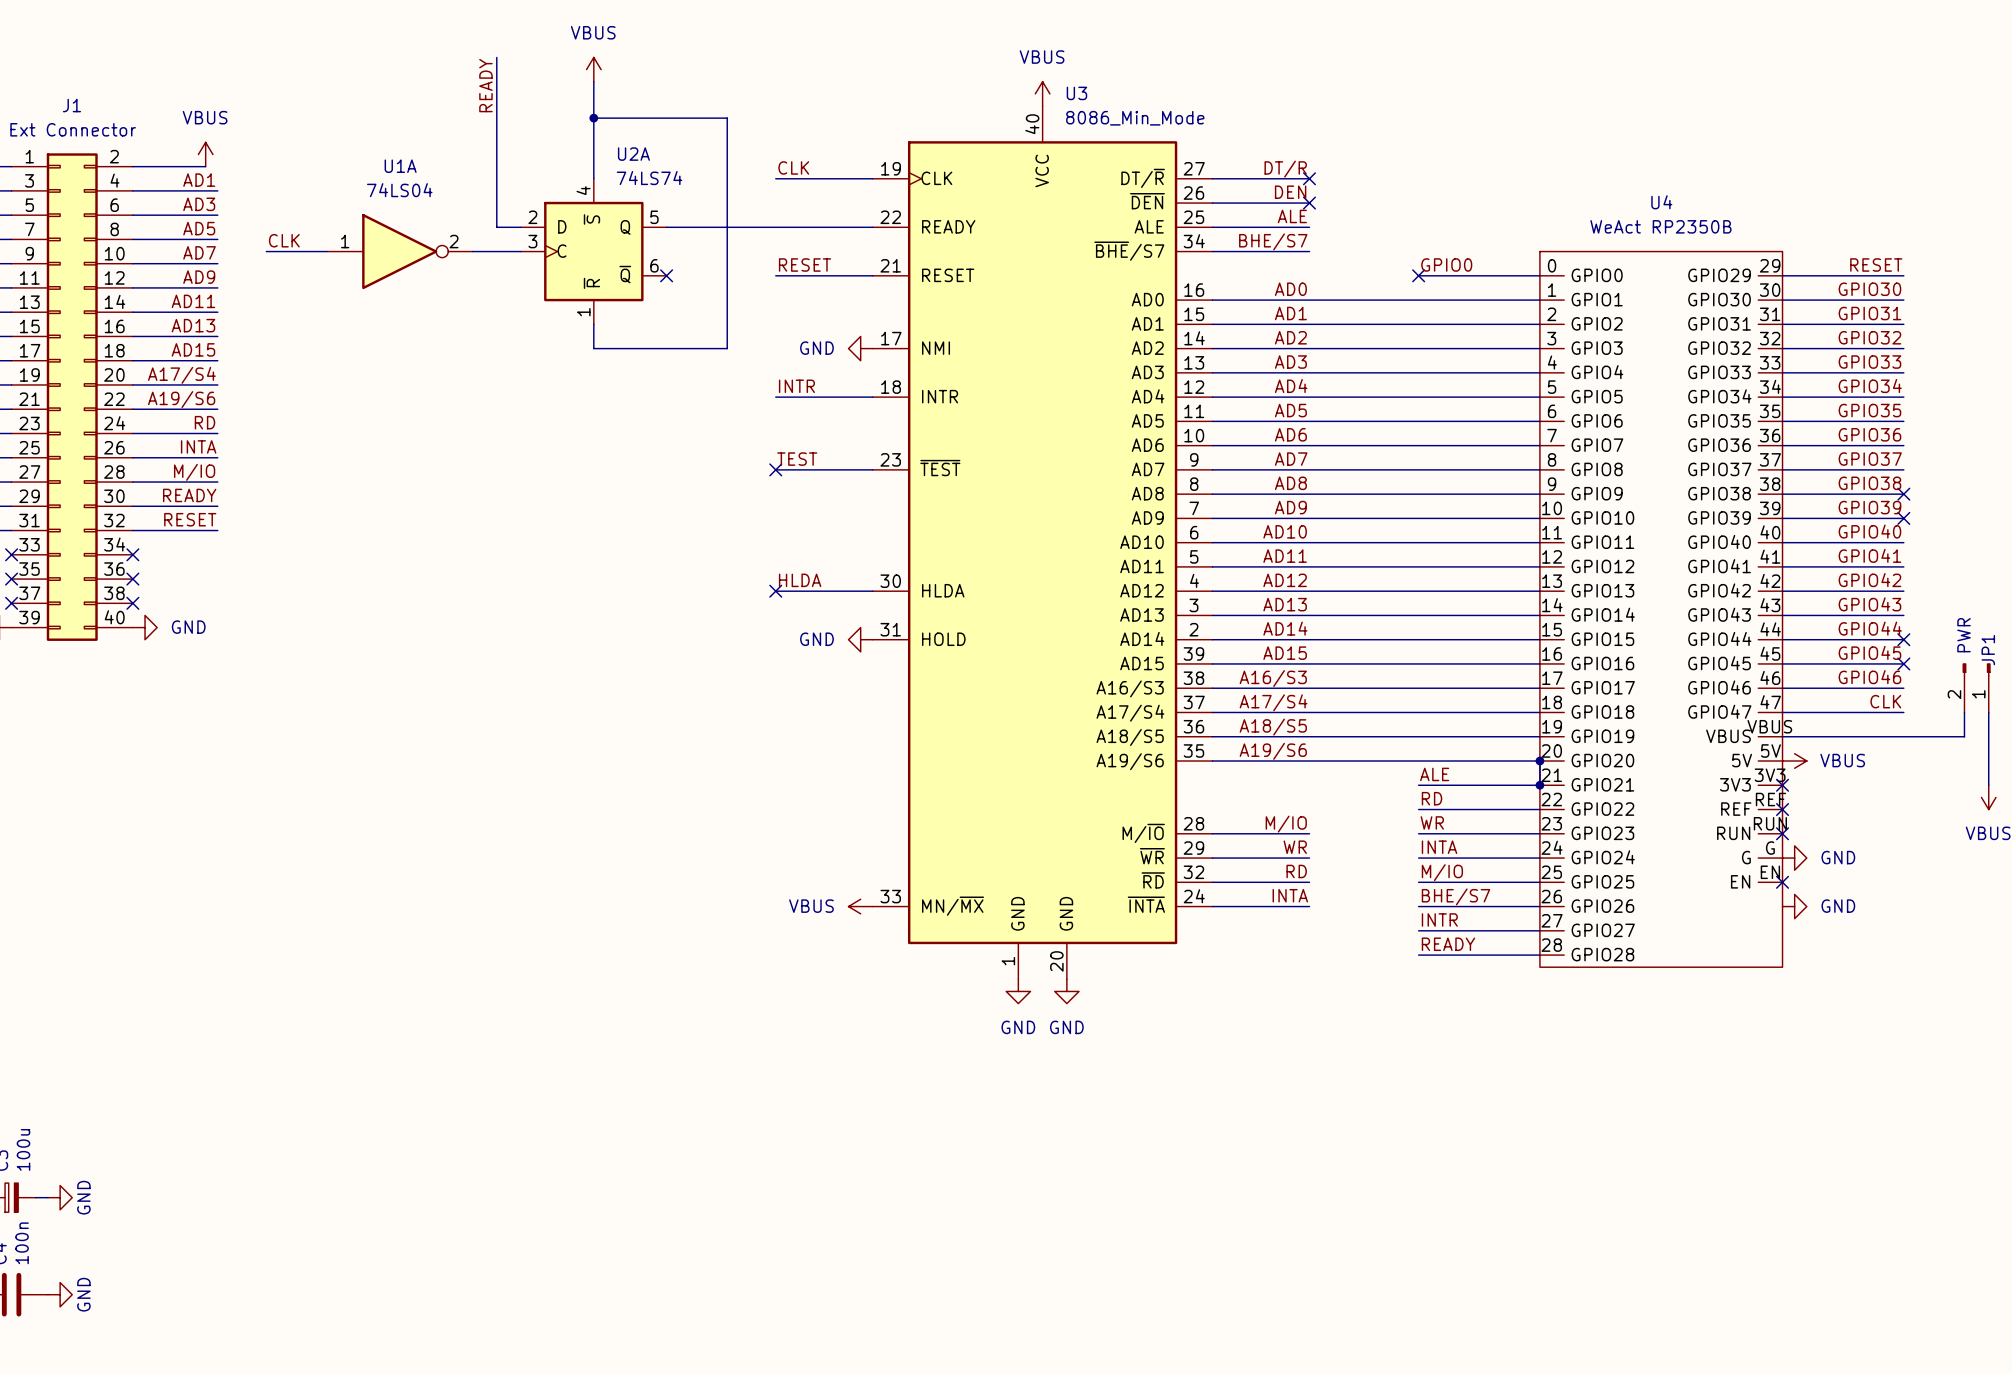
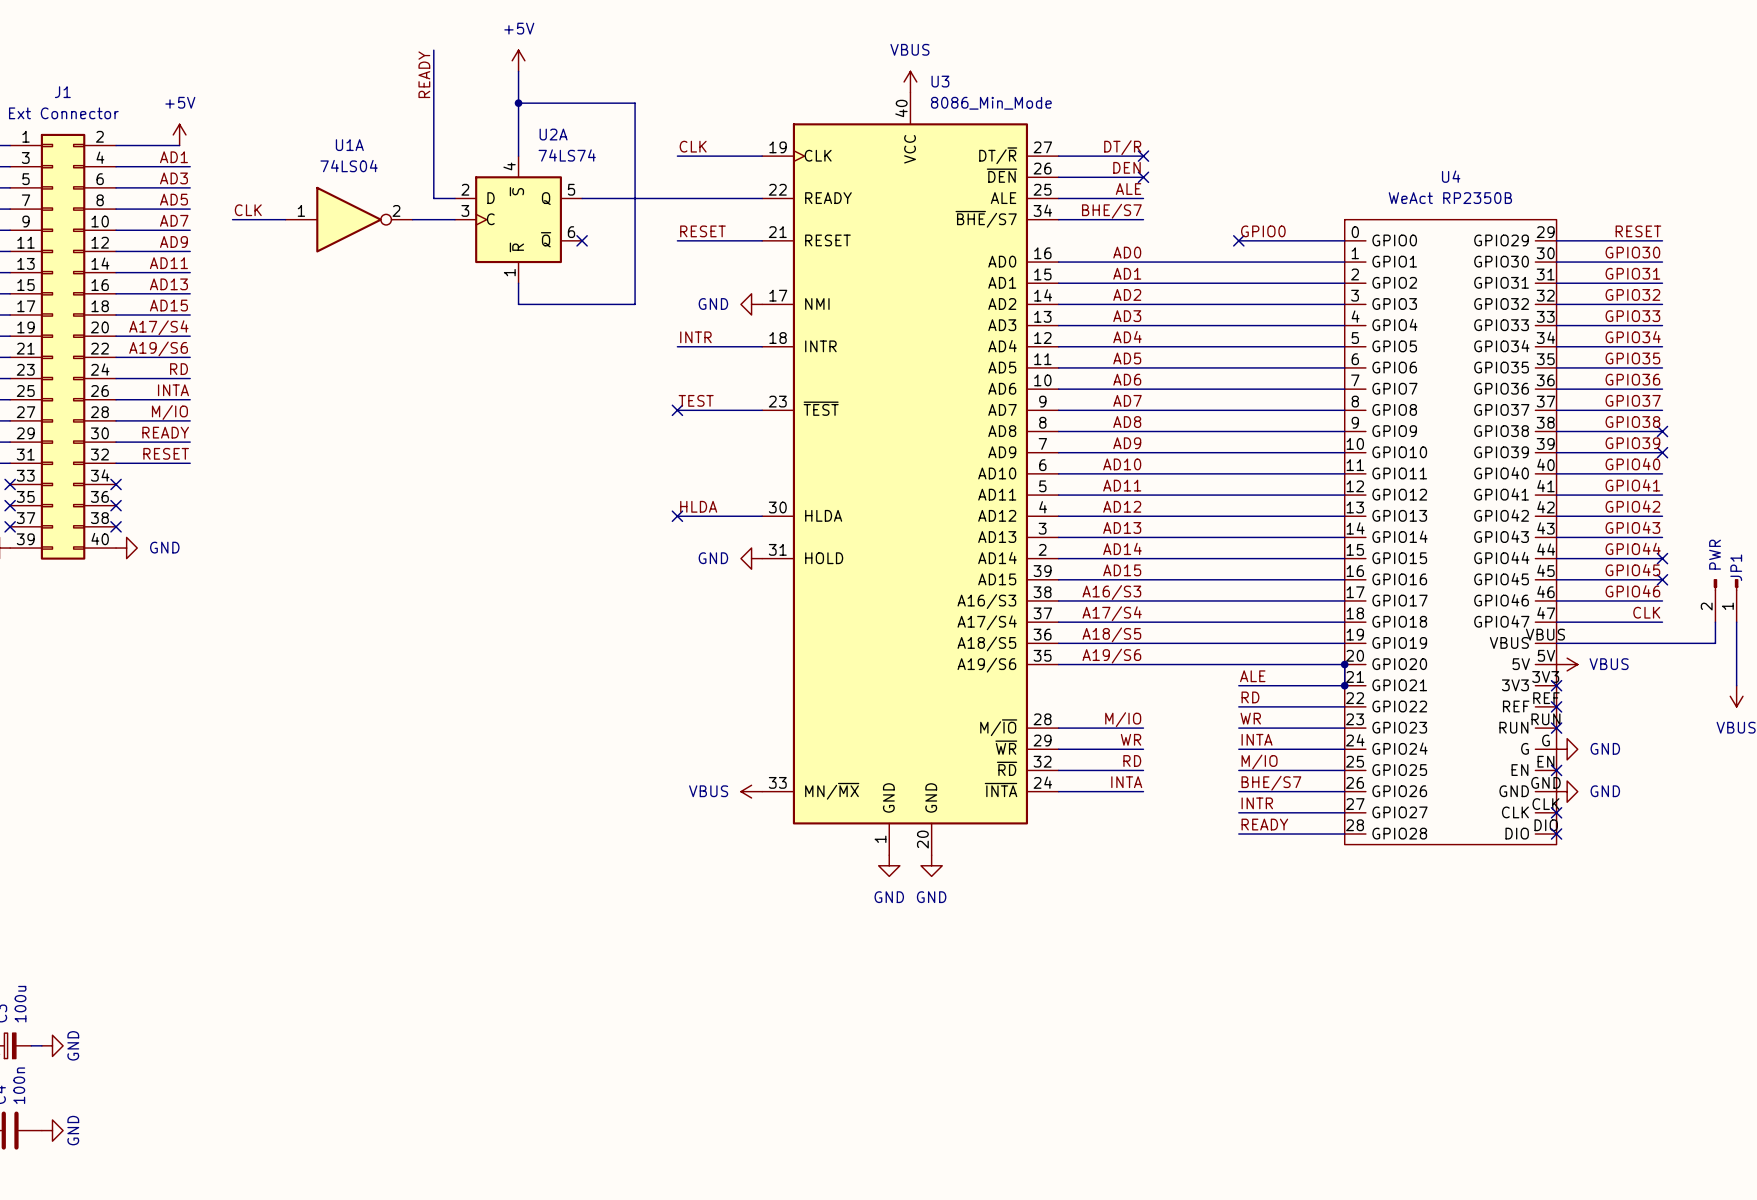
power symbol: VBUS (593, 69) -> +5V (518, 60)
power symbol: VBUS (205, 154) -> +5V (179, 134)
U4 symbol: [1539, 251, 1783, 968] -> [1344, 219, 1557, 845]
no-connect mark: none -> (1556, 812)
no-connect mark: none -> (1556, 834)

